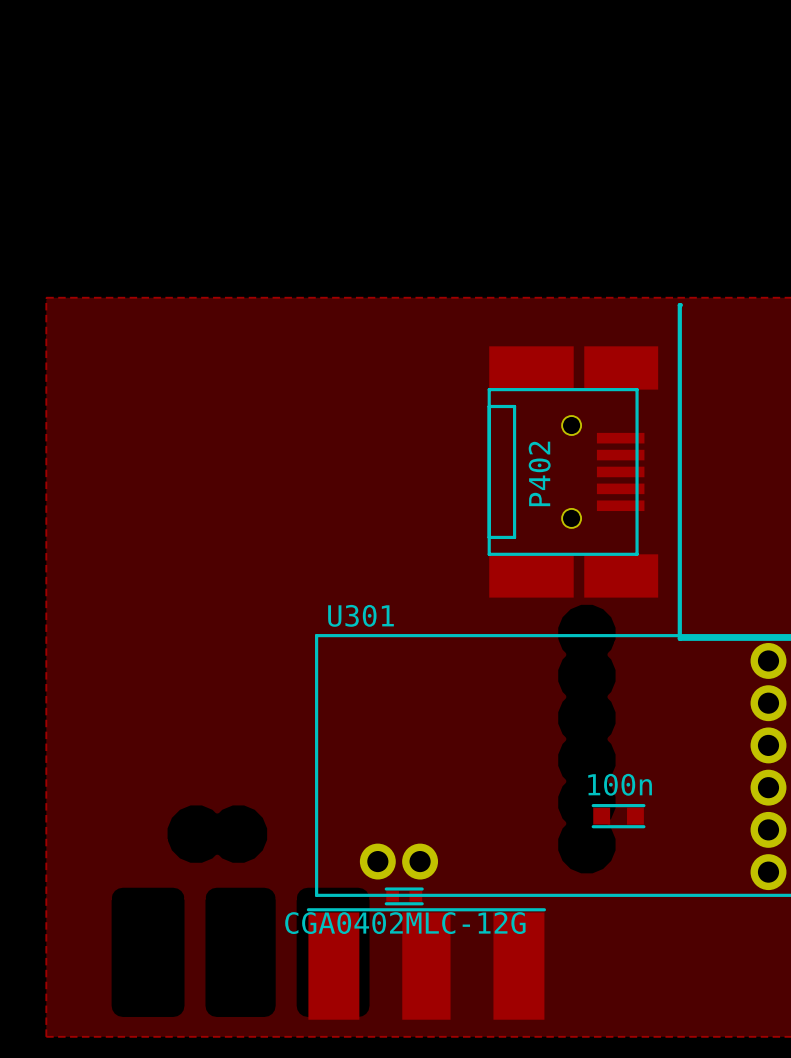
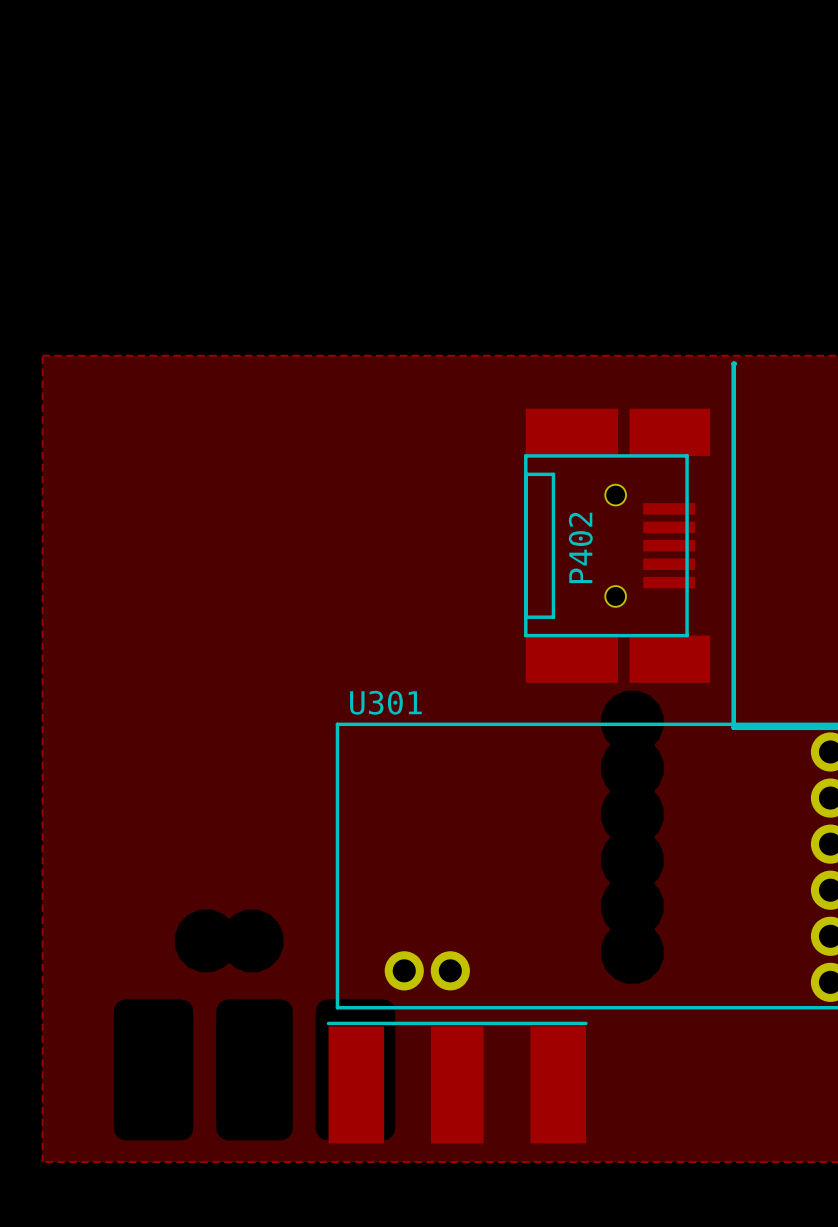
part: 100n (618, 816) -> none
part: CGA0402MLC-12G (404, 896) -> none

